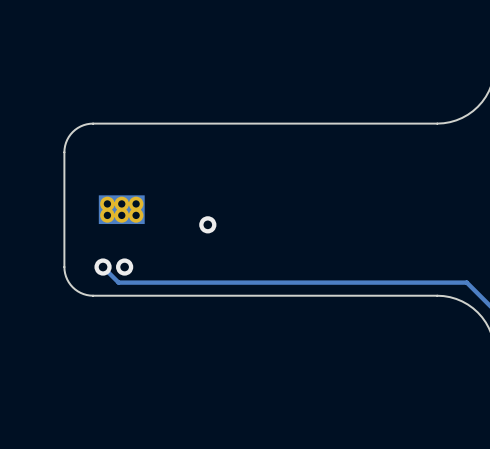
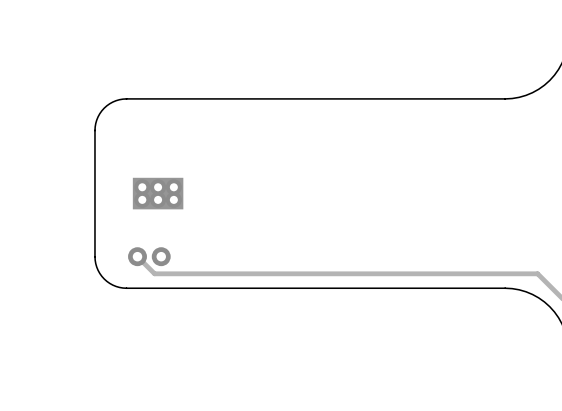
via: (207, 224) -> none

